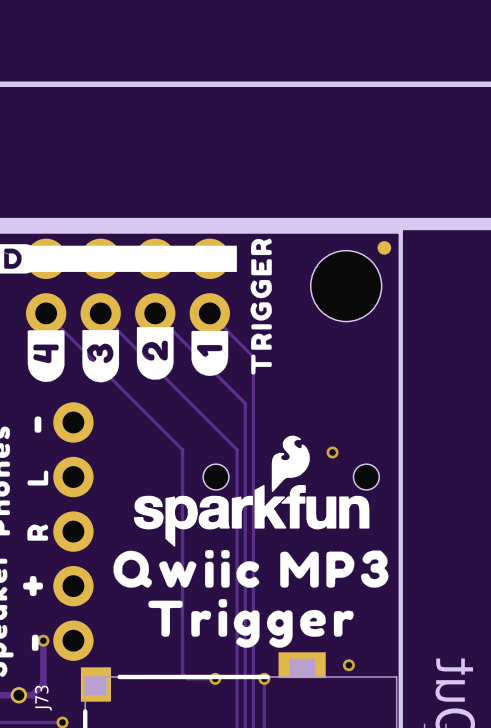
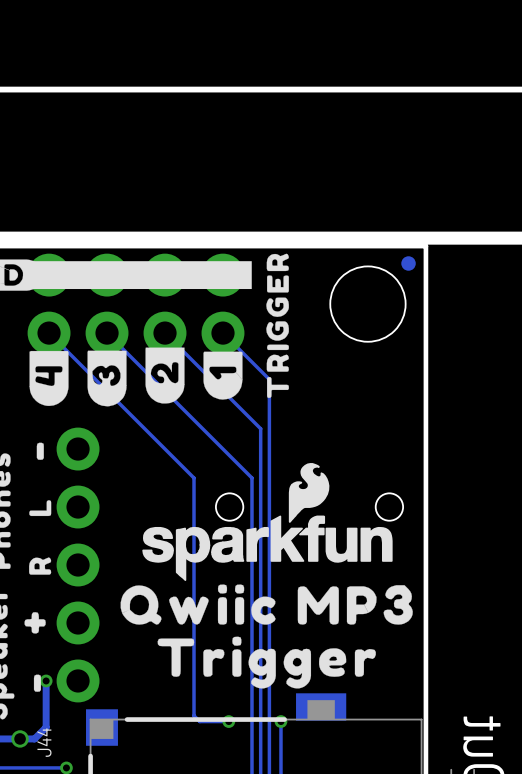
via: (332, 452) -> none
via: (348, 665) -> none
J73 name: J73 (43, 698) -> J44 (44, 742)

